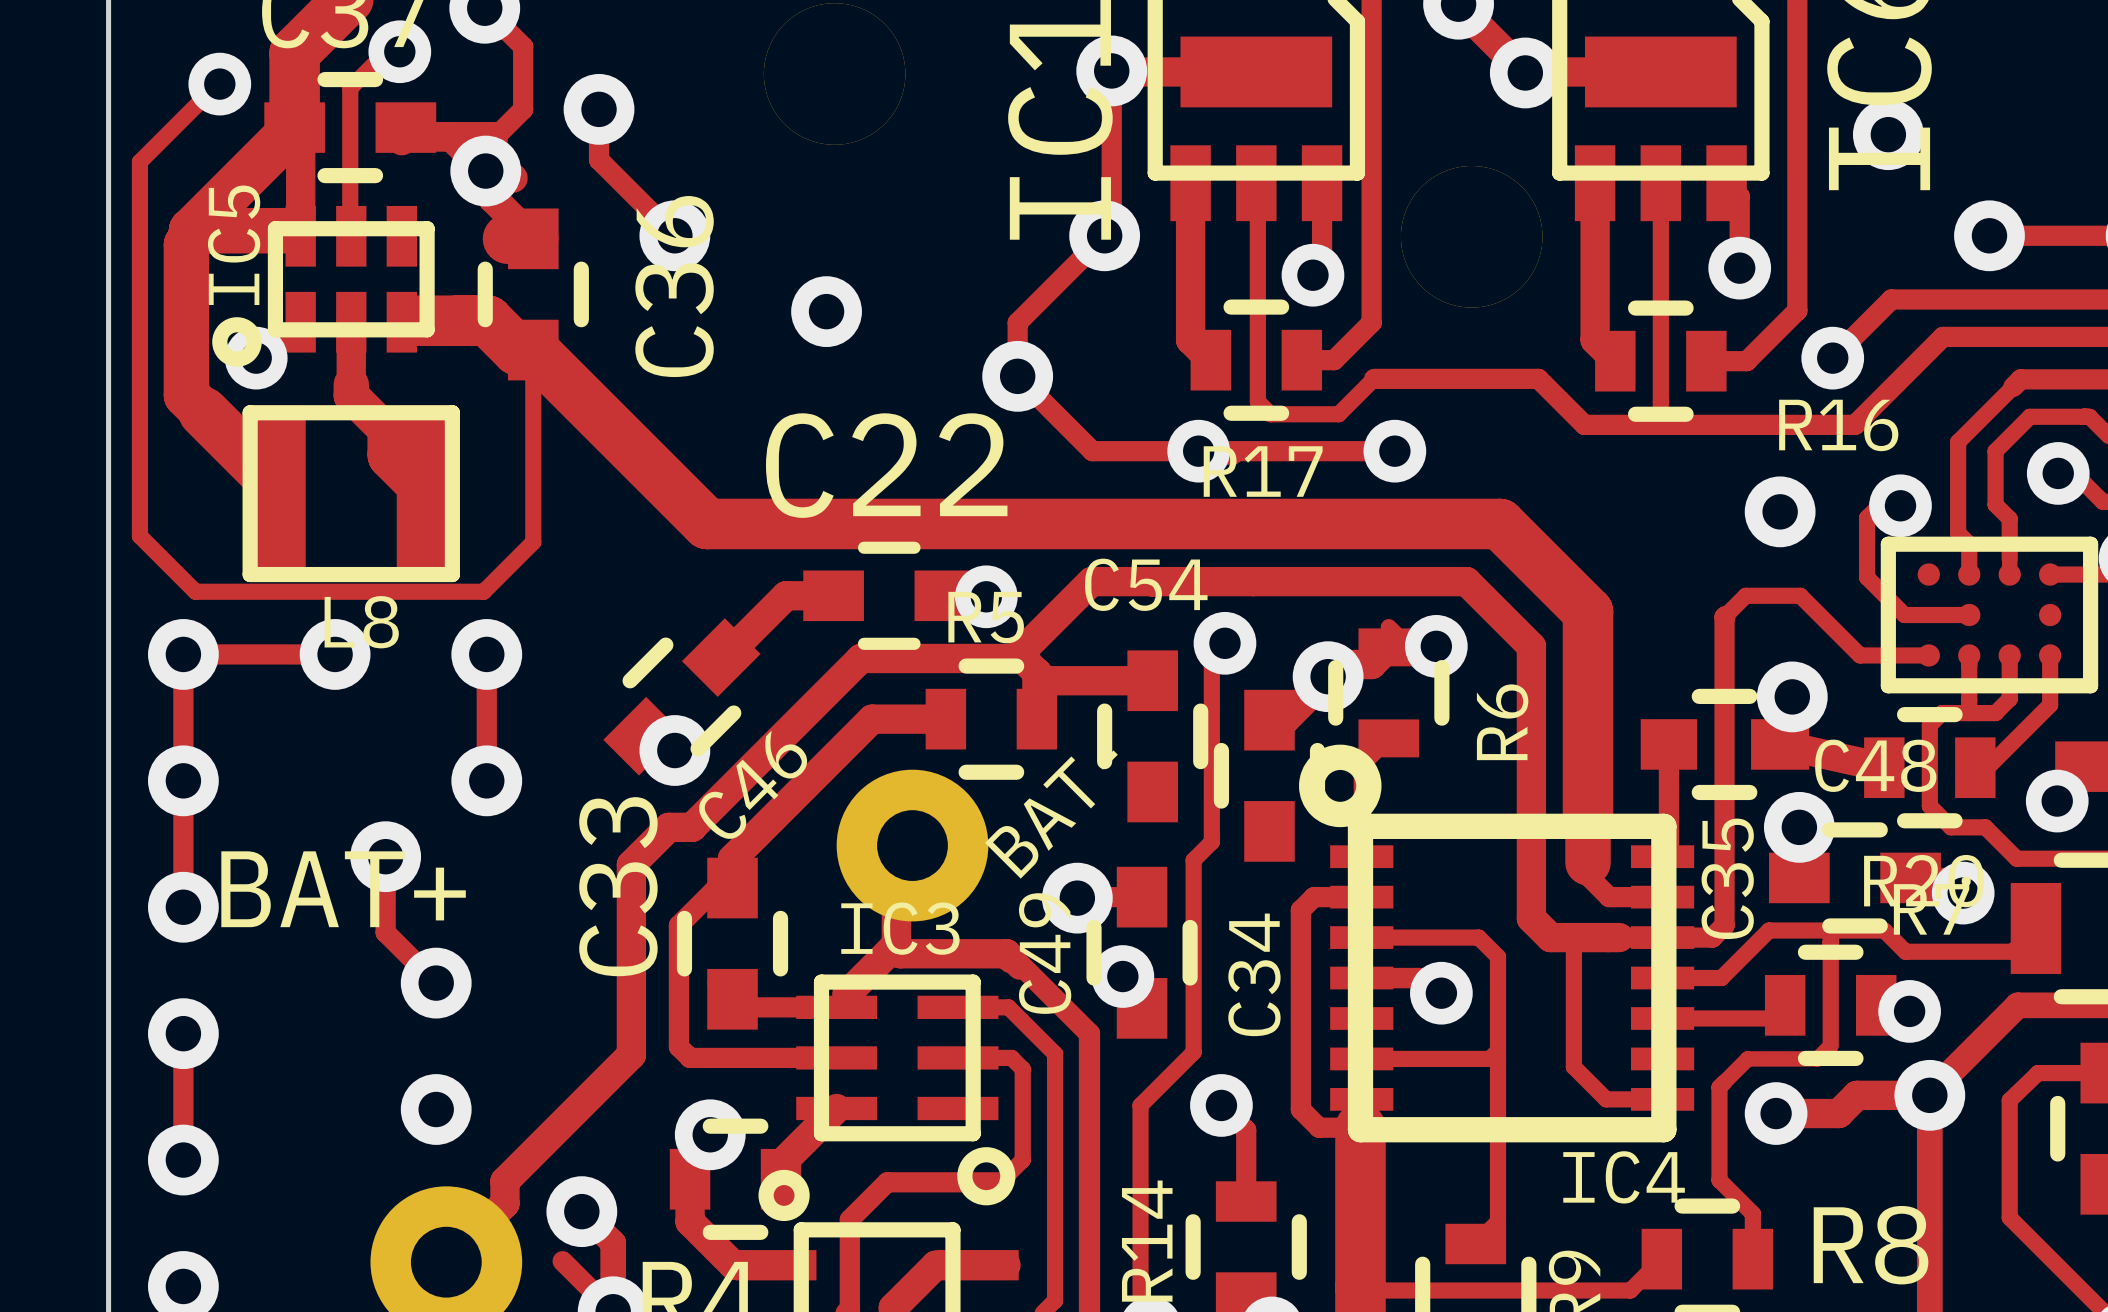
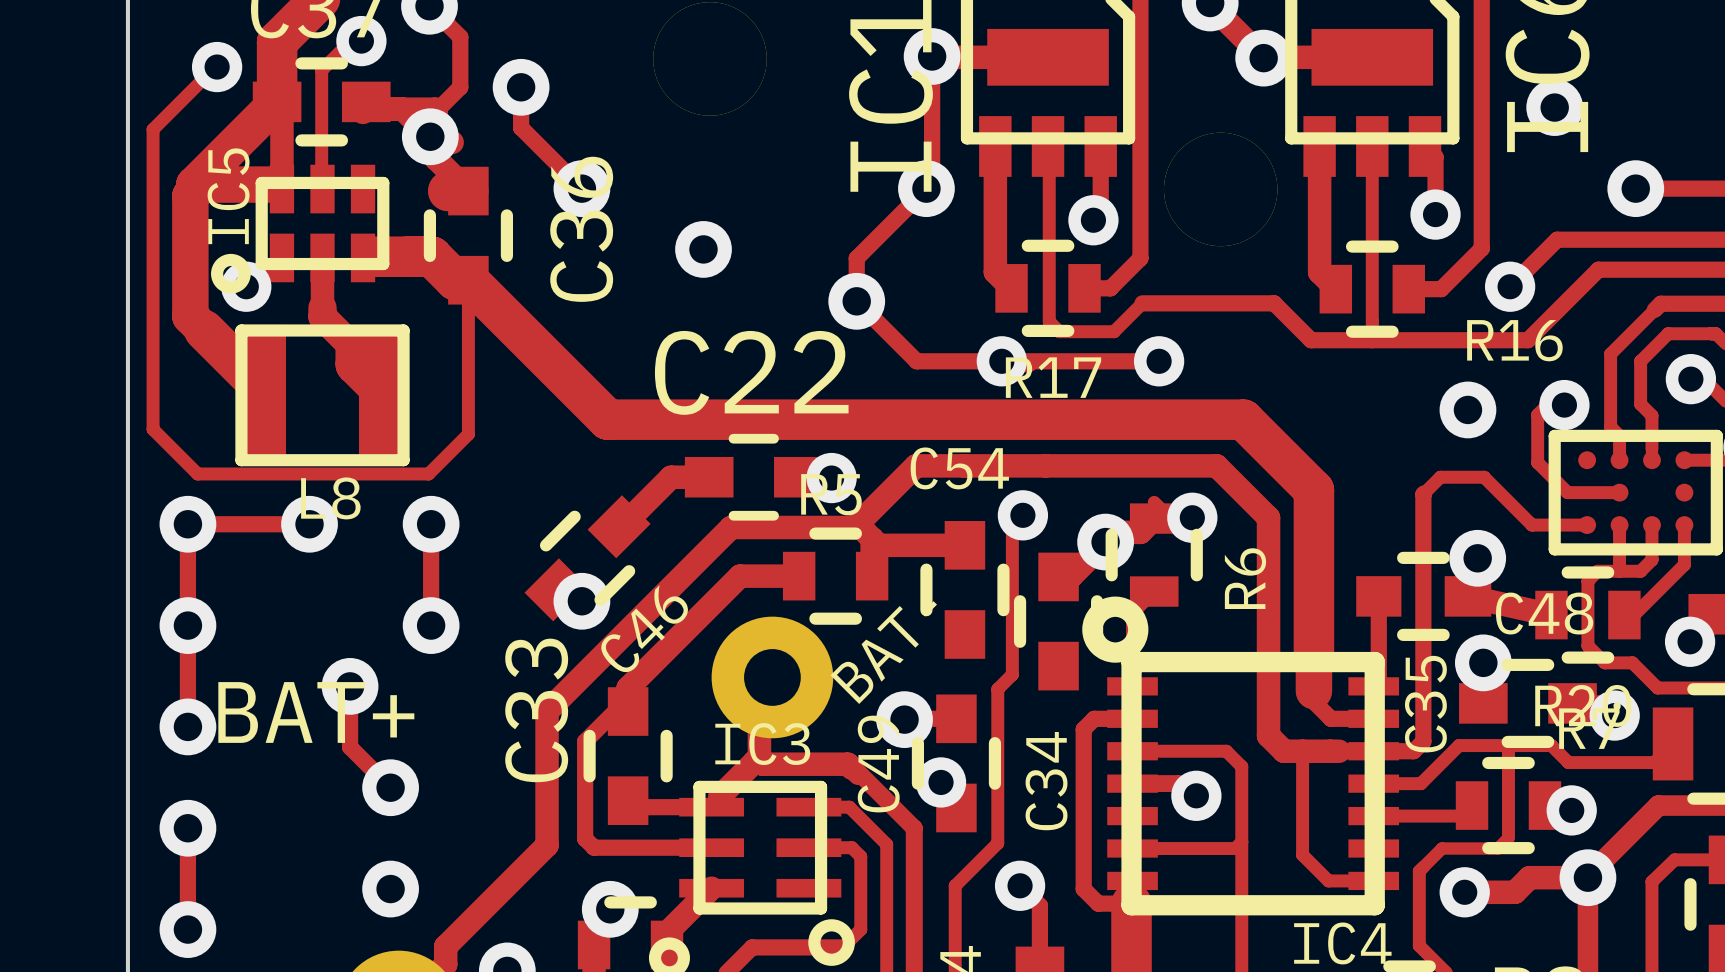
track: (692, 827) (668, 827) (631, 864) (631, 888) -> (595, 662) (547, 711)

